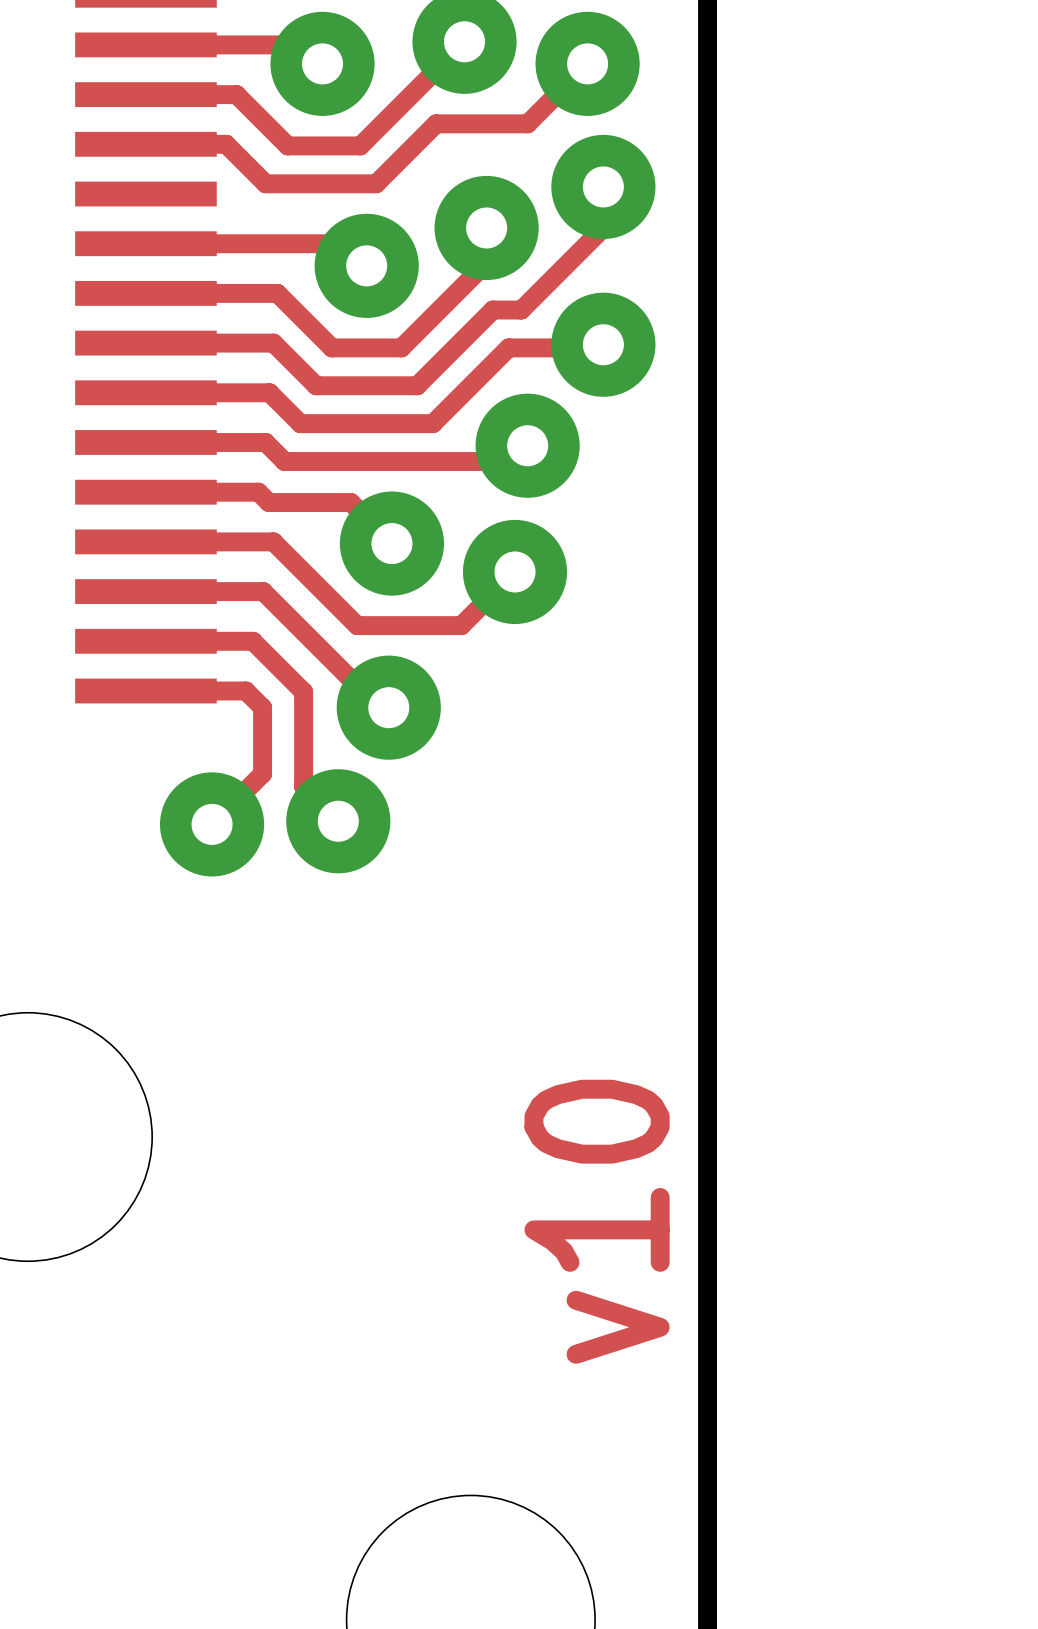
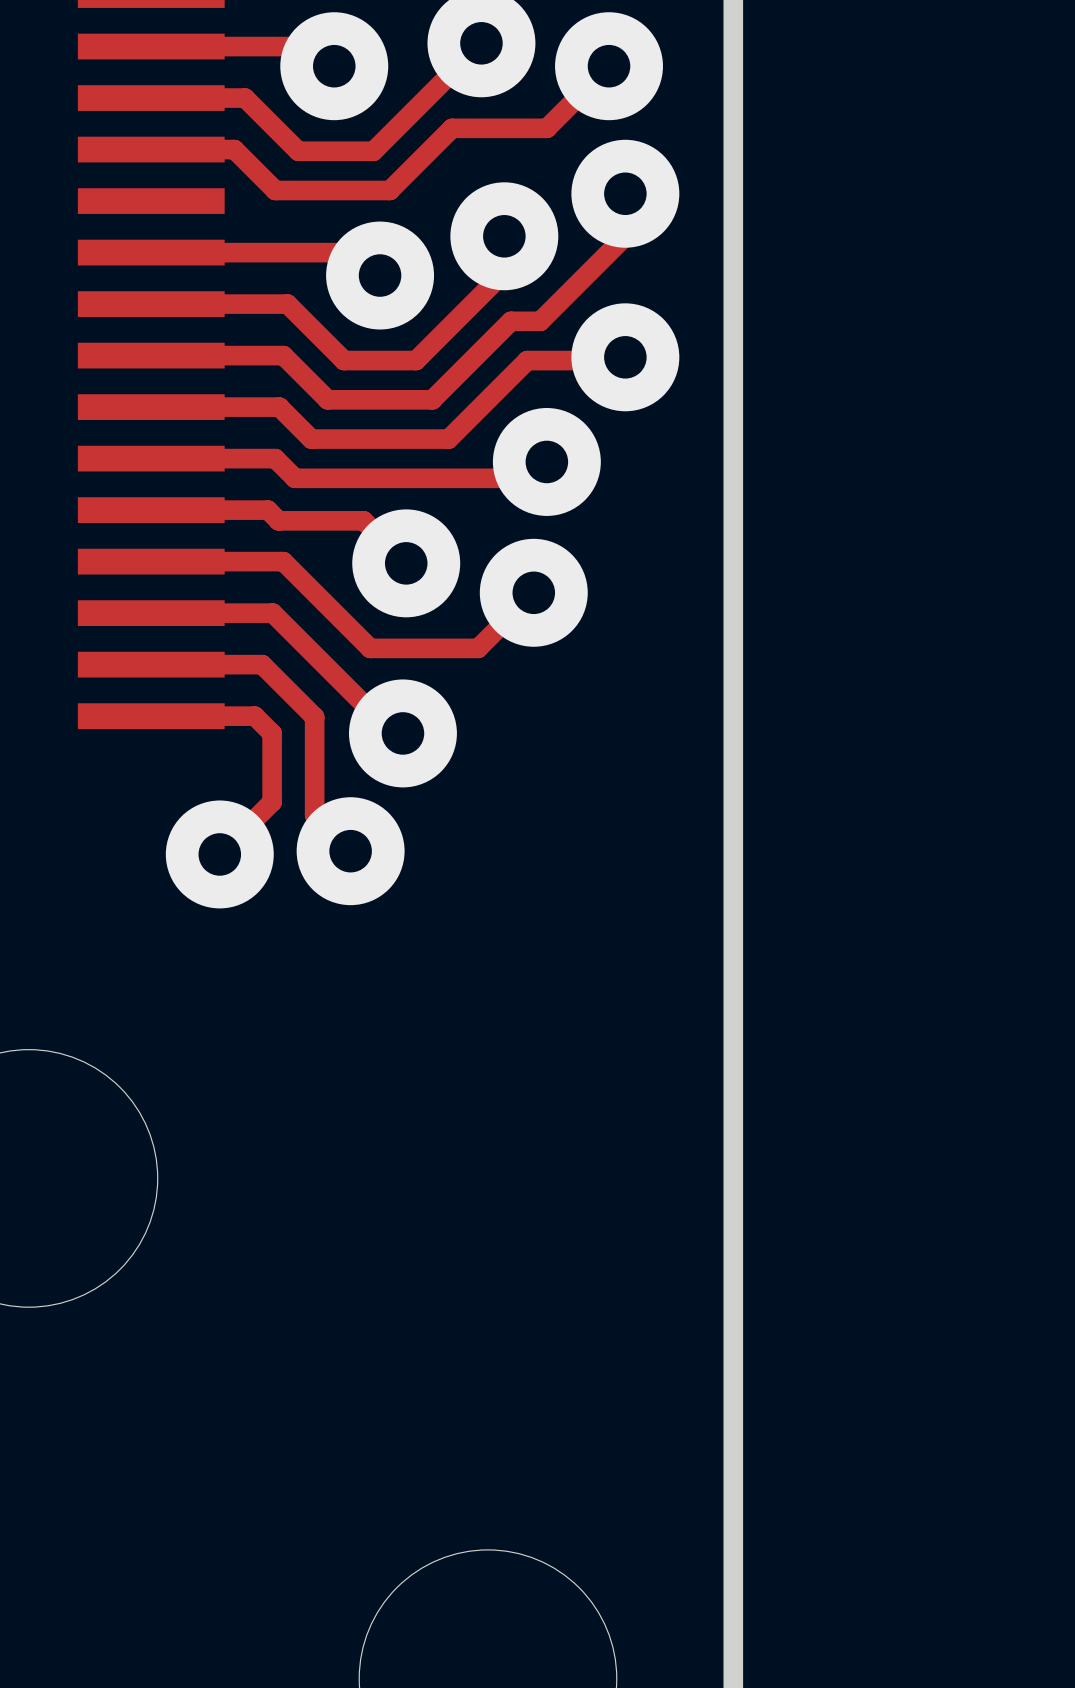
text: v10 (597, 1221) -> none

